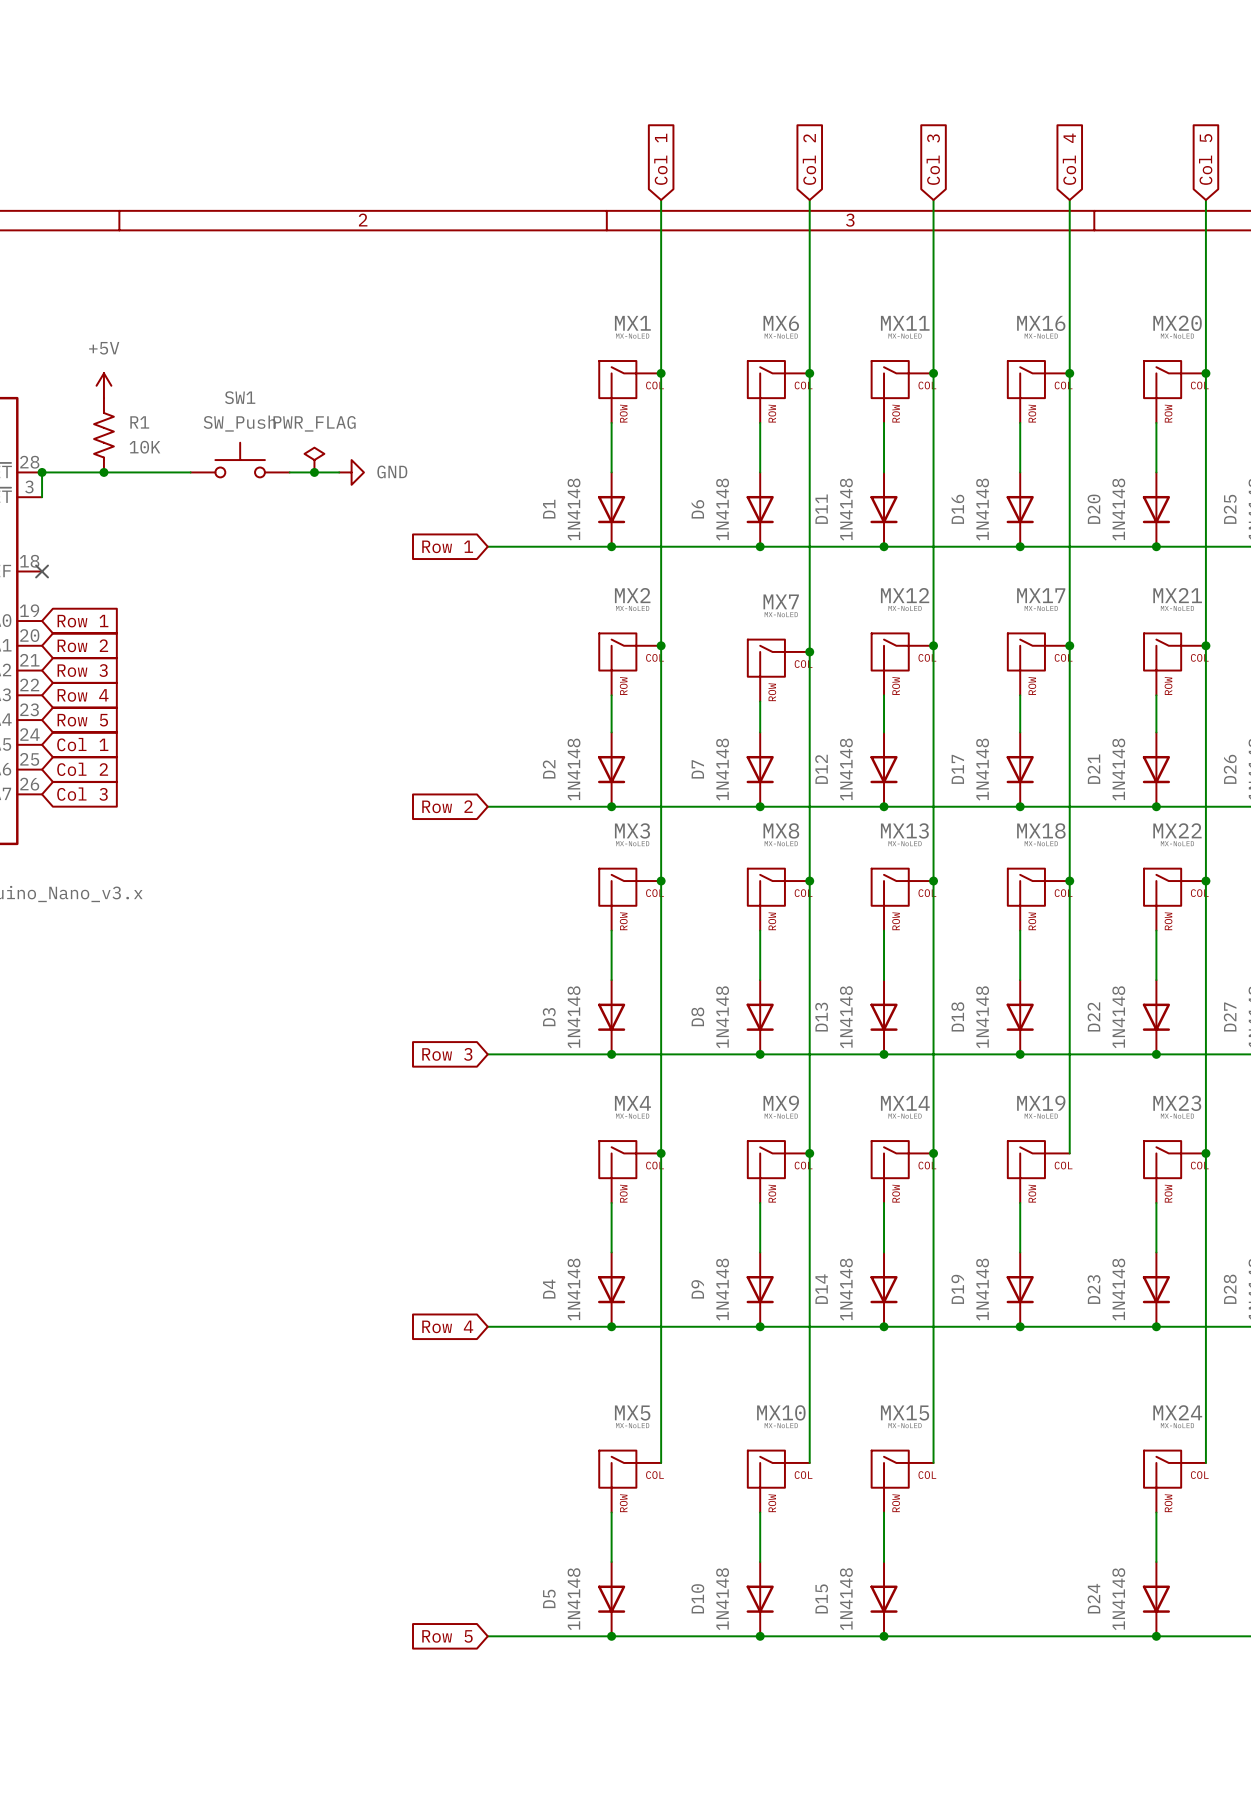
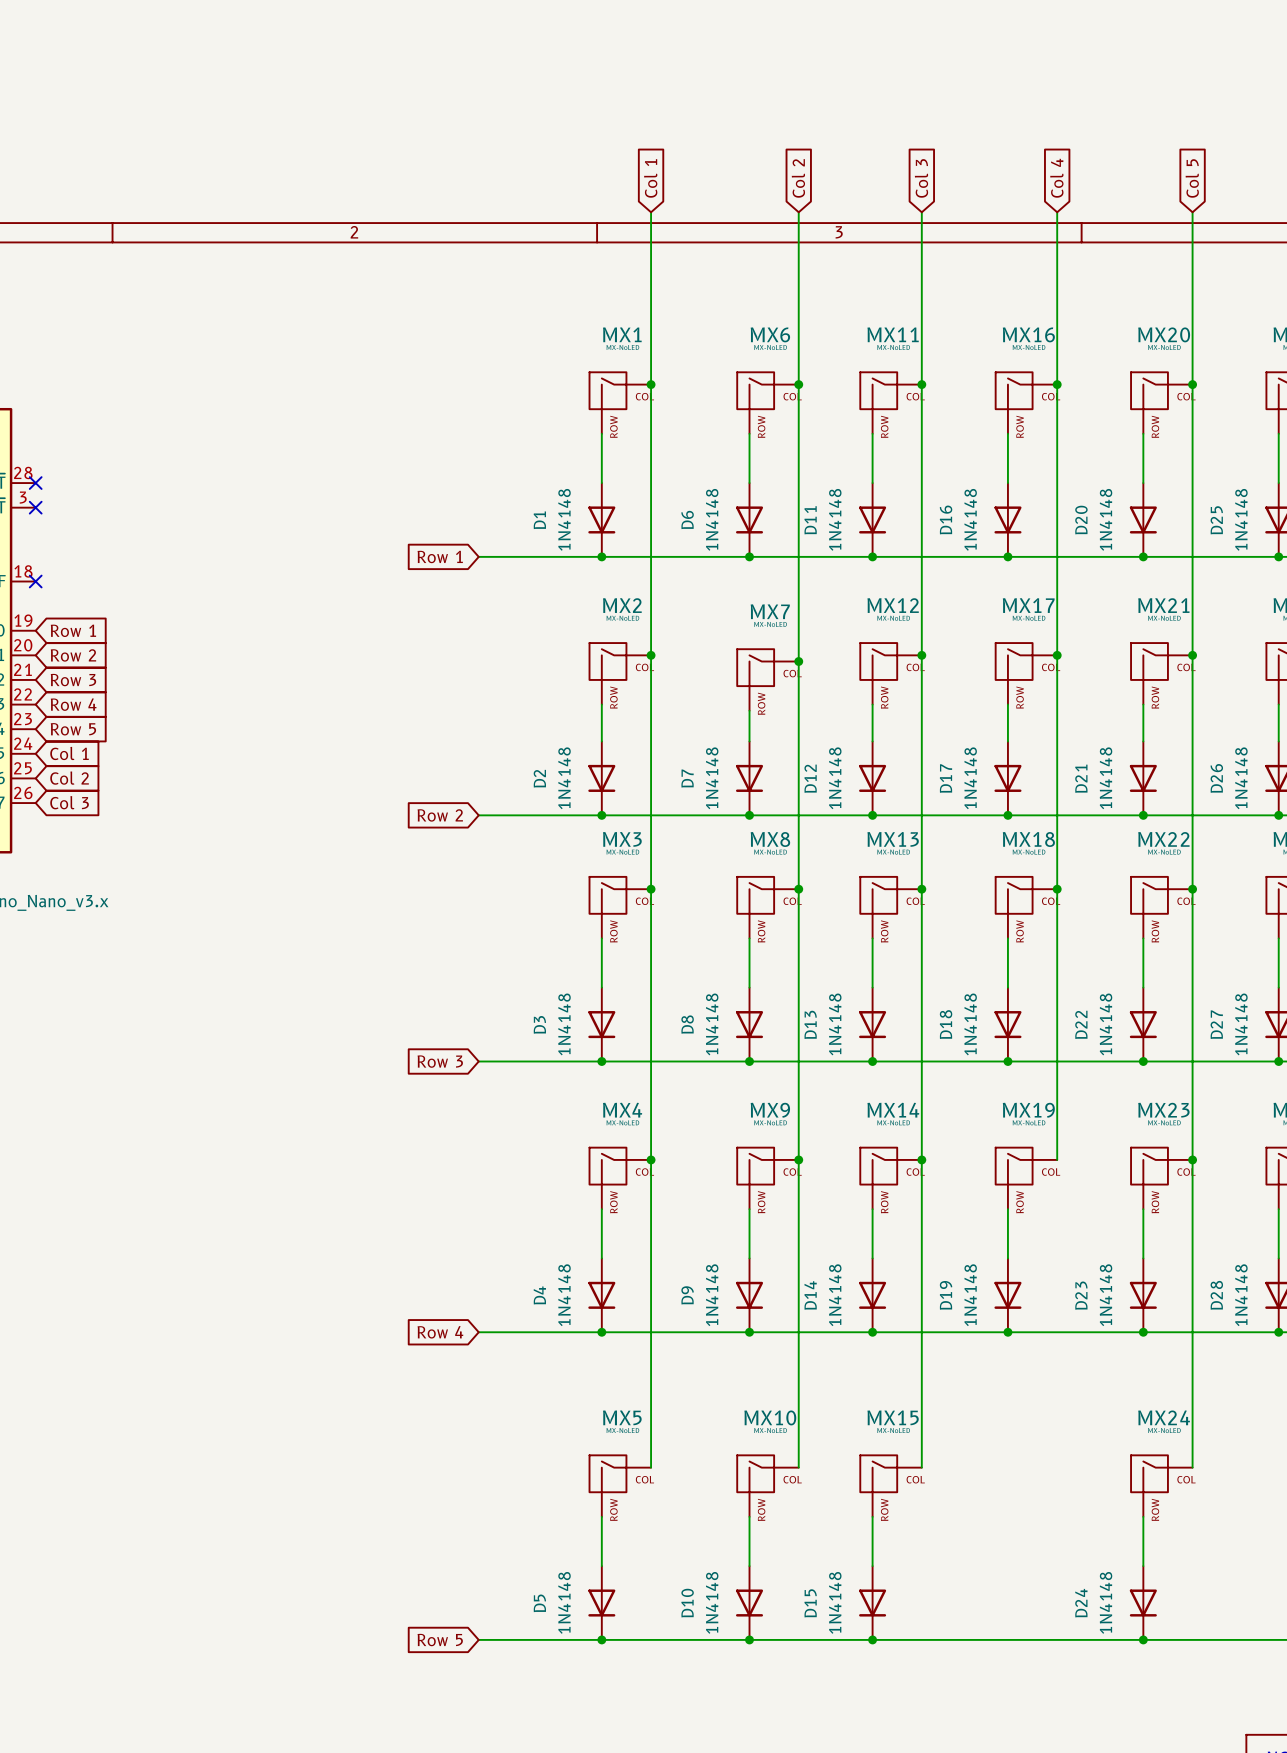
power symbol: +5V (103, 385) -> none
R1: 10K (103, 435) -> none
SW1: SW_Push (240, 460) -> none
power symbol: PWR_FLAG (314, 460) -> none
junction: (42, 472) -> none
no-connect mark: none -> (35, 483)
junction: (103, 472) -> none
wire: (190, 472) (42, 472) (42, 497) -> none
wire: (289, 472) (339, 472) -> none
junction: (314, 472) -> none
power symbol: GND (351, 472) -> none
no-connect mark: none -> (35, 507)

